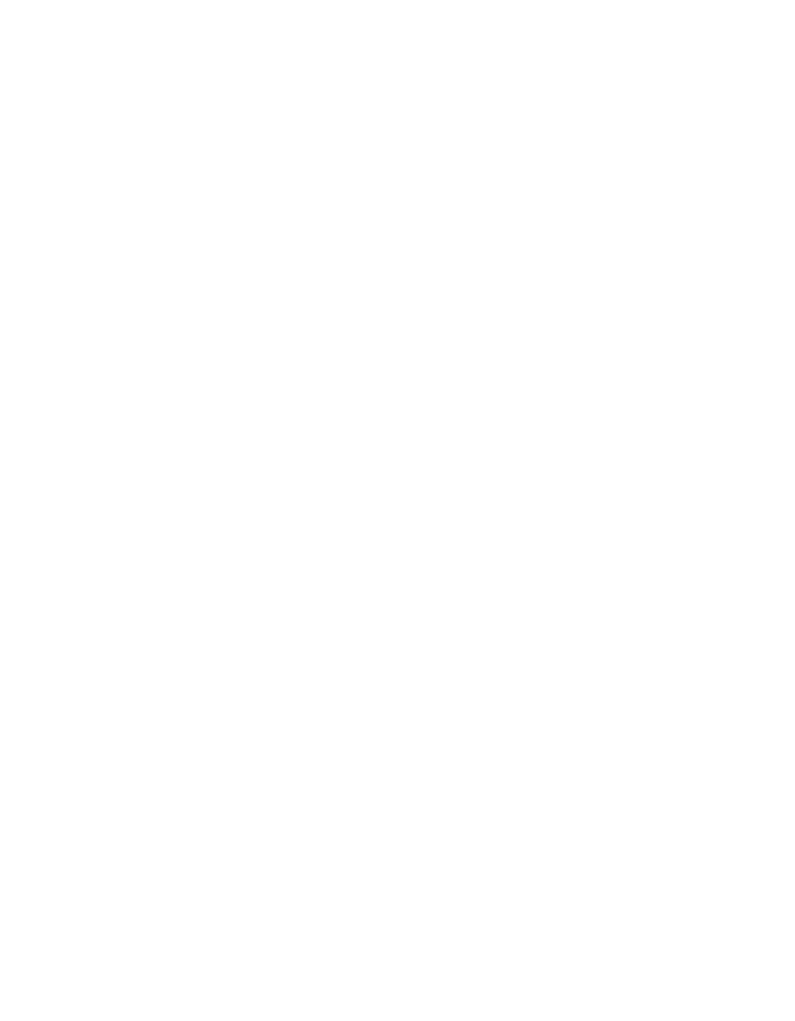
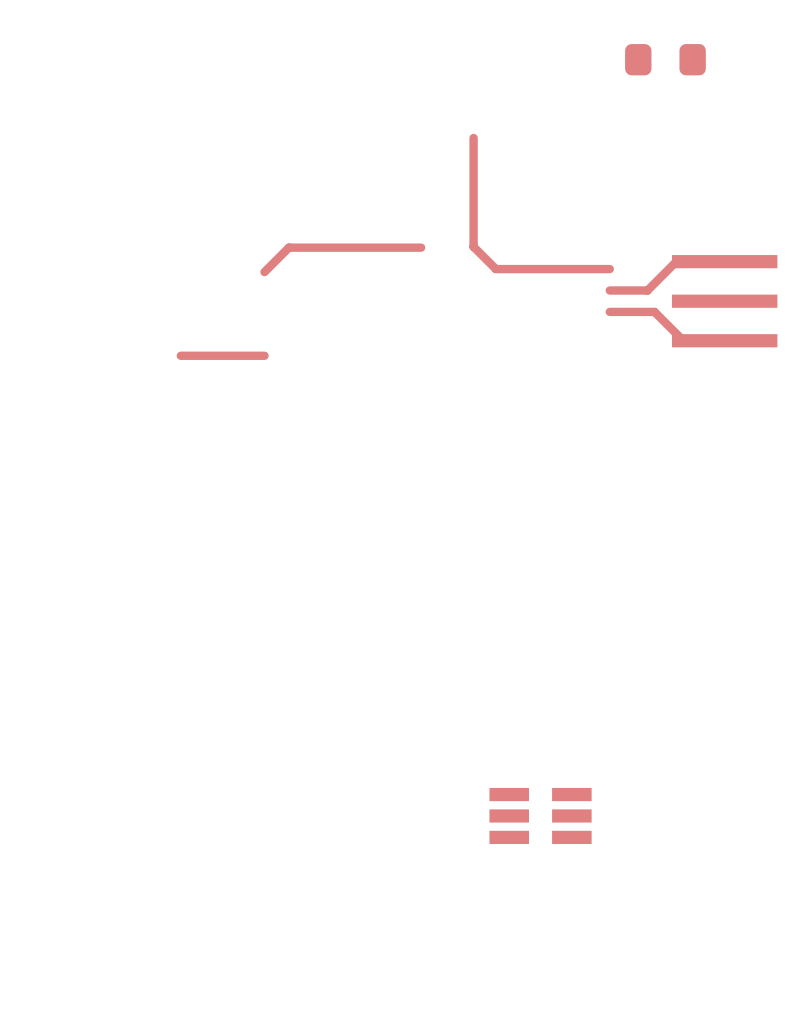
part: none -> (665, 59)
top track: none -> (473, 137) (473, 246) (495, 269) (609, 269)
top track: none -> (421, 247) (288, 247) (264, 272)
top track: none -> (724, 261) (676, 261) (647, 290) (609, 290)
part: none -> (724, 301)
top track: none -> (609, 311) (654, 311) (683, 340) (724, 340)
top track: none -> (264, 355) (180, 355)
part: none -> (540, 815)

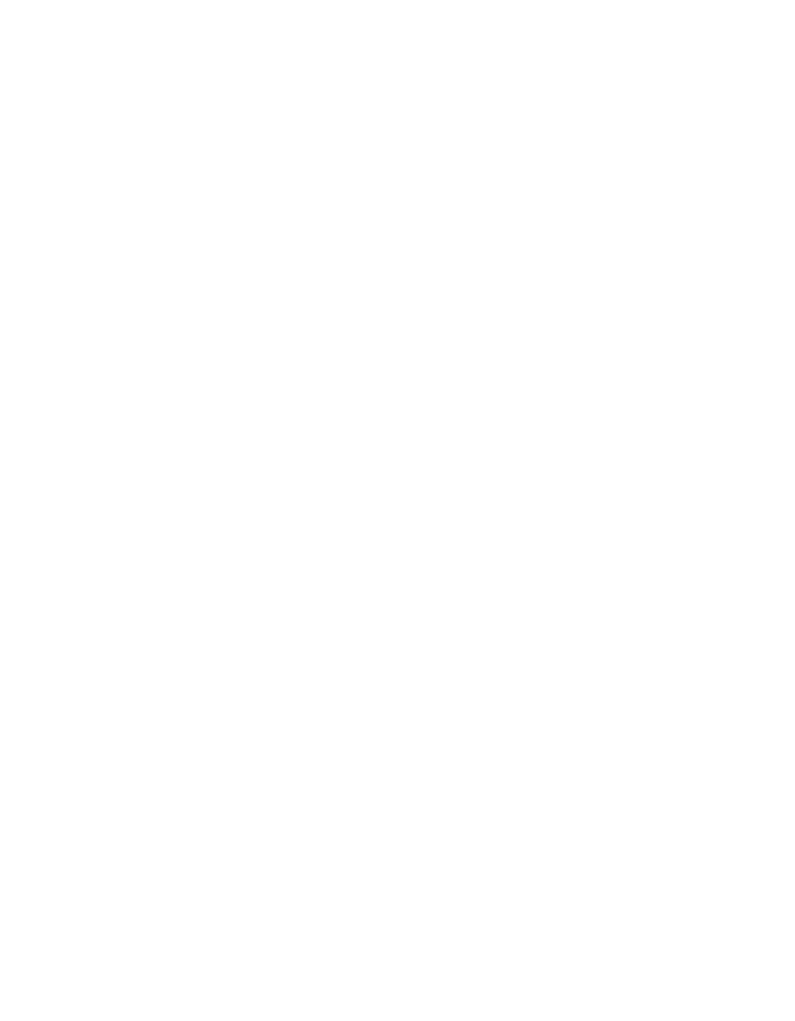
part: (665, 59) -> none
top track: (473, 137) (473, 246) (495, 269) (609, 269) -> none
top track: (421, 247) (288, 247) (264, 272) -> none
top track: (724, 261) (676, 261) (647, 290) (609, 290) -> none
part: (724, 301) -> none
top track: (609, 311) (654, 311) (683, 340) (724, 340) -> none
top track: (264, 355) (180, 355) -> none
part: (540, 815) -> none

